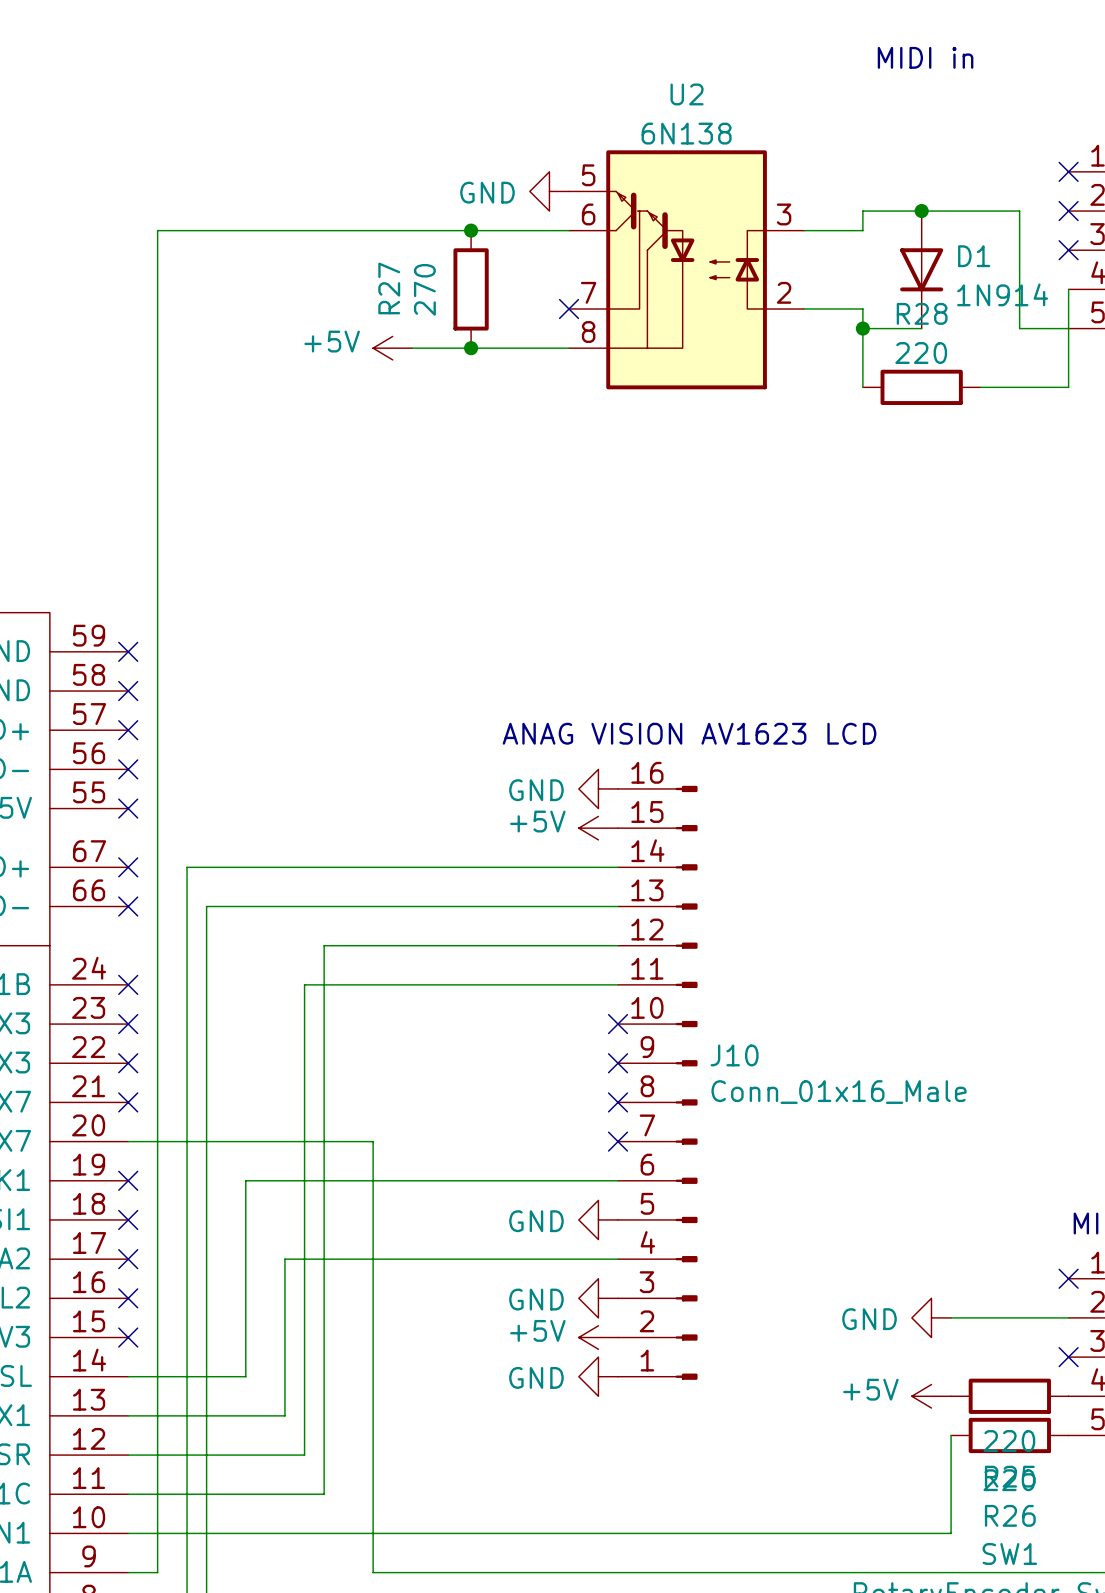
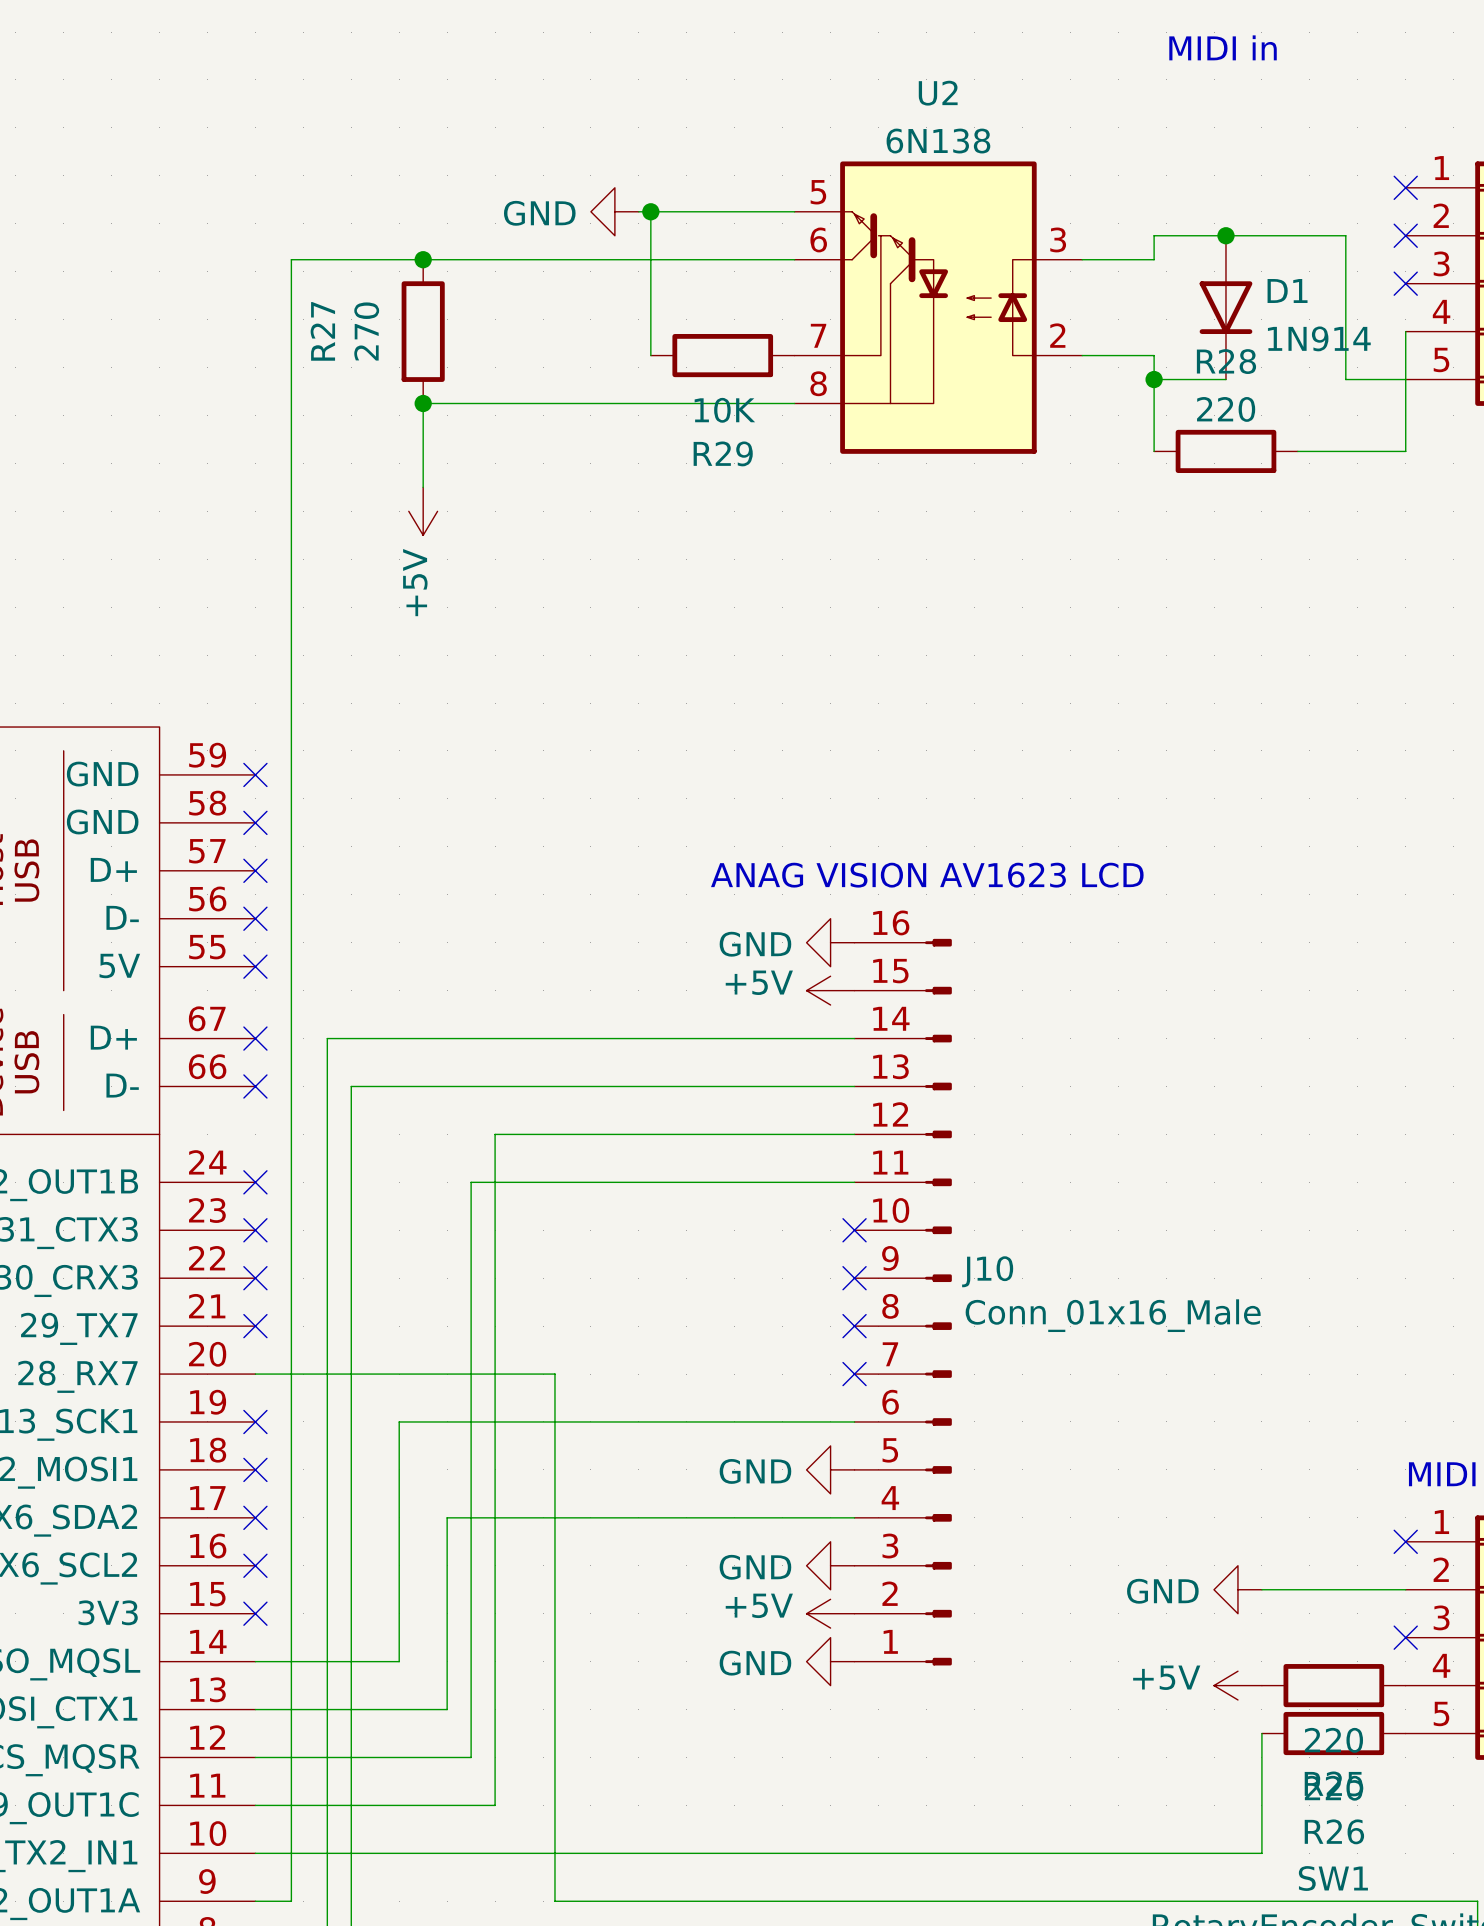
wire: none -> (638, 211) (794, 211)
wire: none -> (650, 211) (650, 355)
power symbol position: GND (549, 191) -> GND (614, 211)
junction: none -> (423, 259)
junction position: (471, 230) -> (650, 211)
R27 position: (471, 289) -> (423, 331)
R29: none -> 10K (722, 355)
no-connect mark: (569, 308) -> none
junction: none -> (423, 403)
power symbol rotation: 0° (392, 348) -> 90° counterclockwise (423, 511)
power symbol position: +5V (392, 348) -> +5V (423, 511)
wire: none -> (602, 403) (423, 403) (423, 487)
junction: (471, 348) -> none

